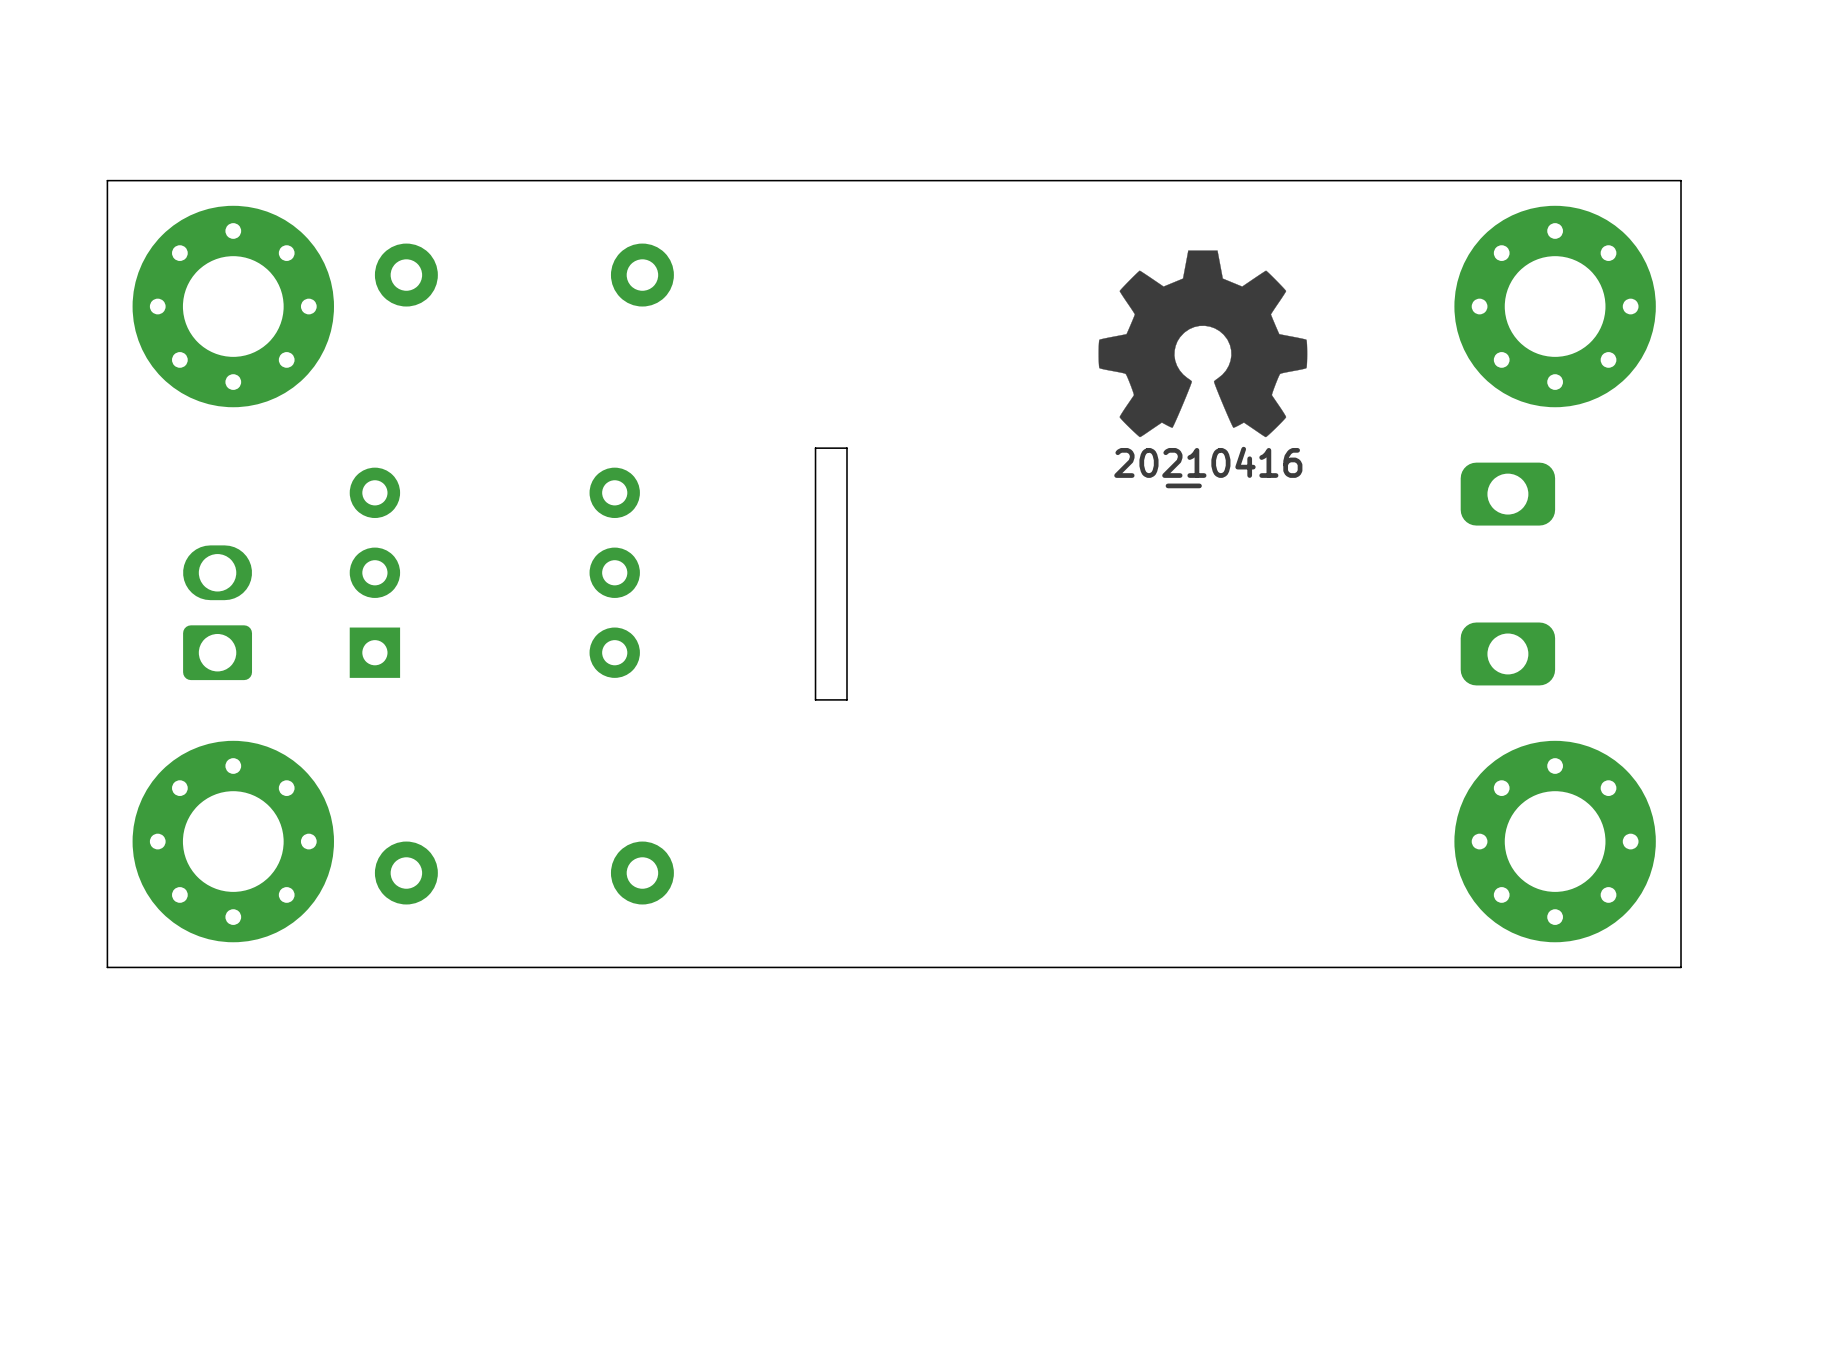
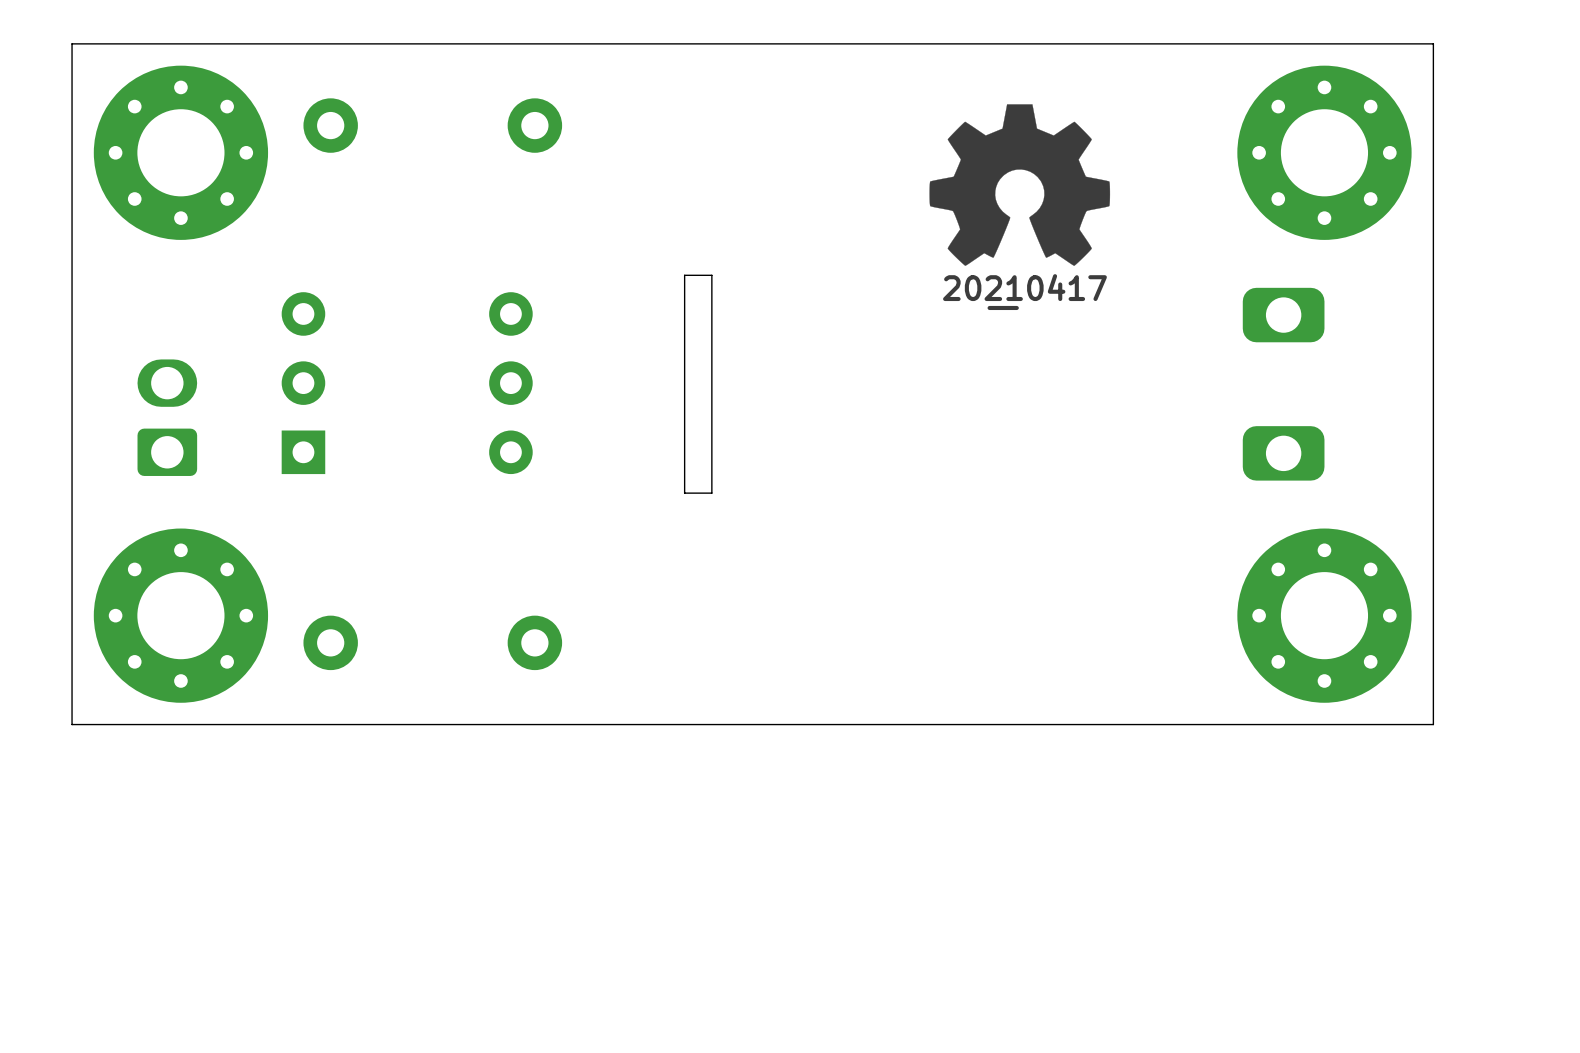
drawing shape: [1114, 446, 1303, 489] -> [943, 274, 1107, 311]

